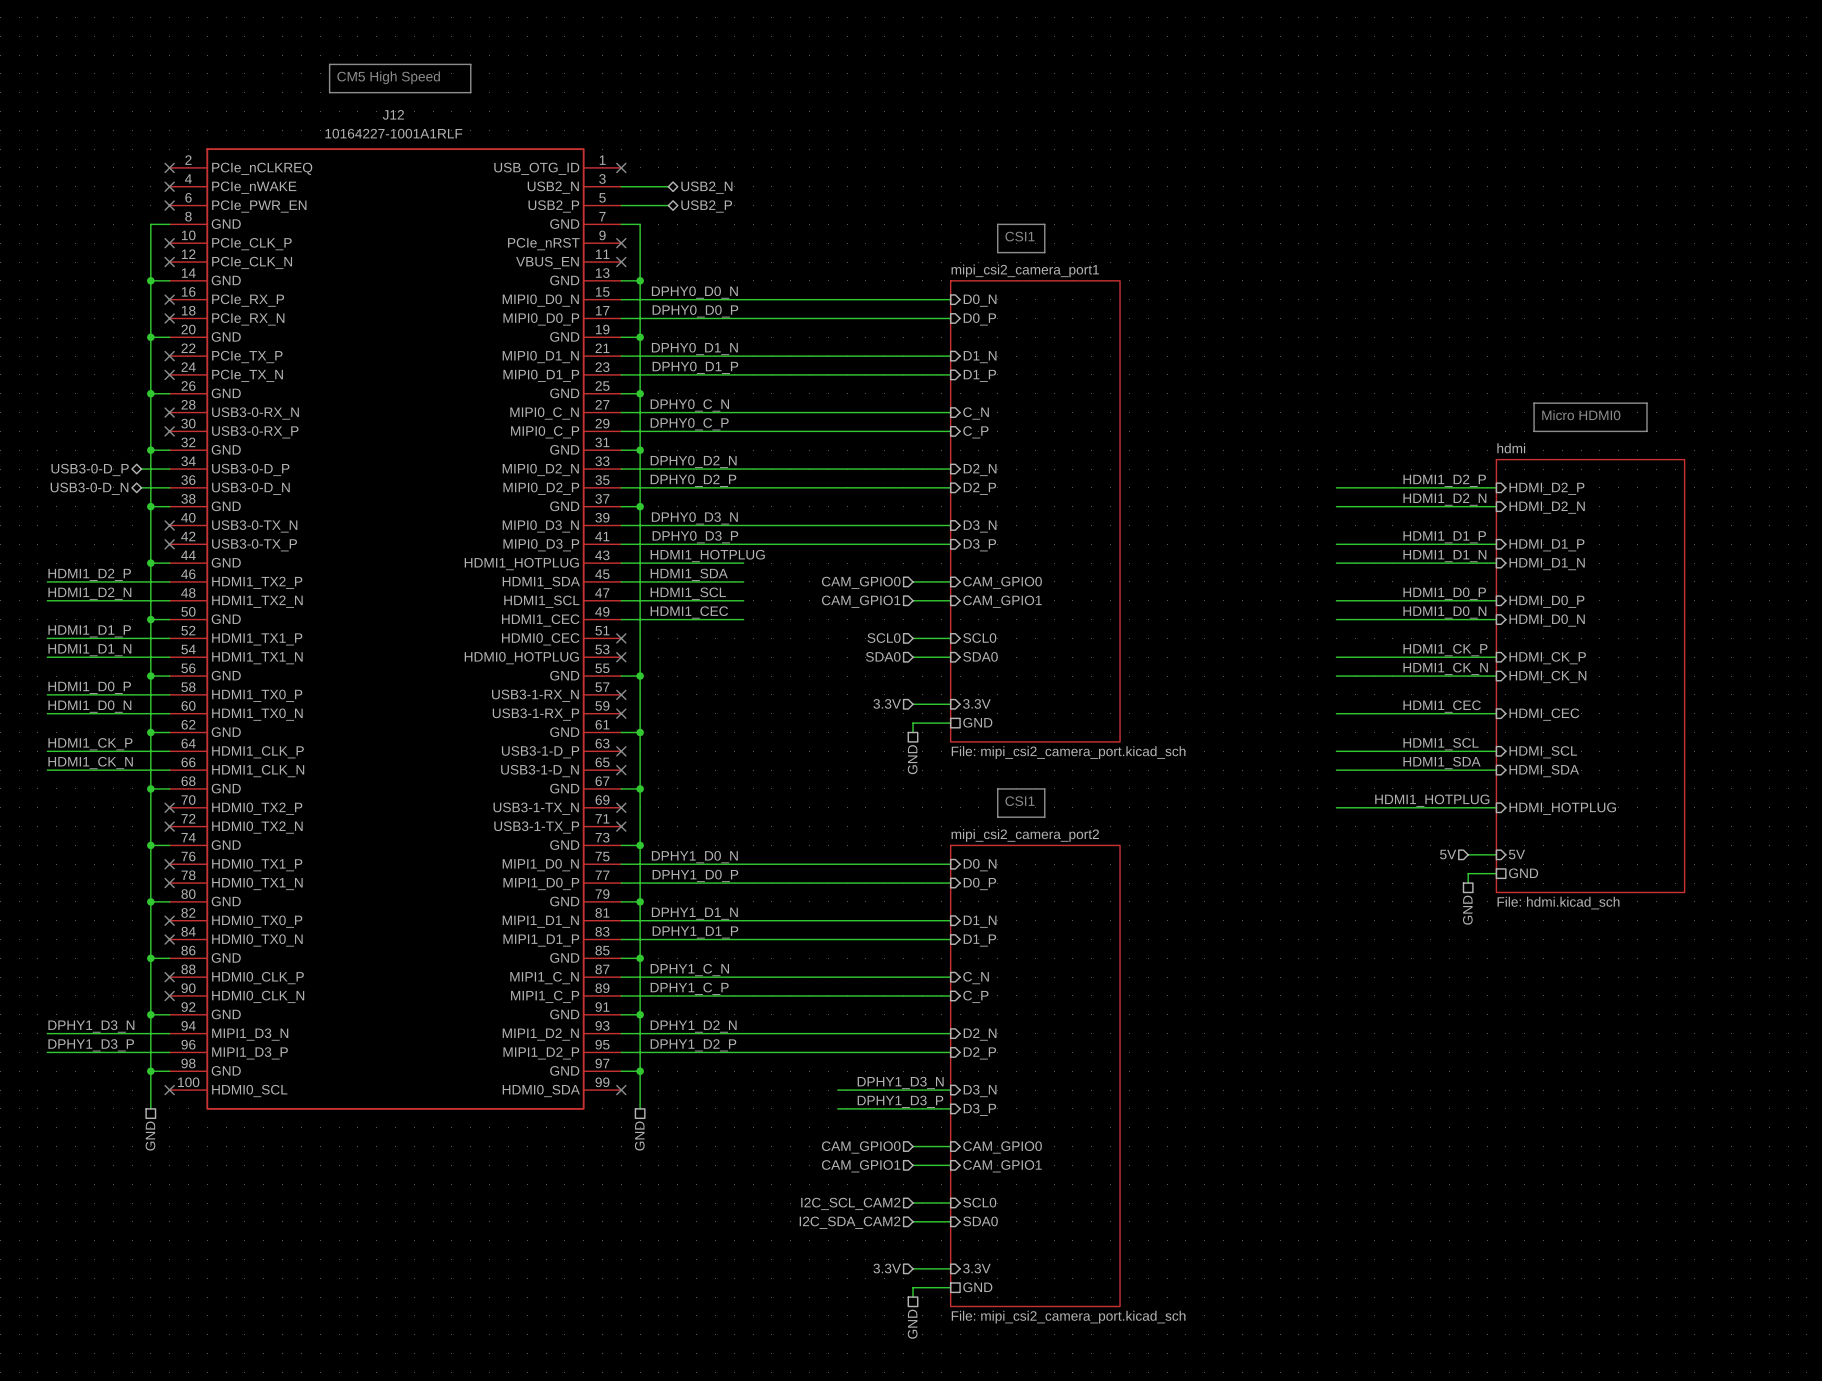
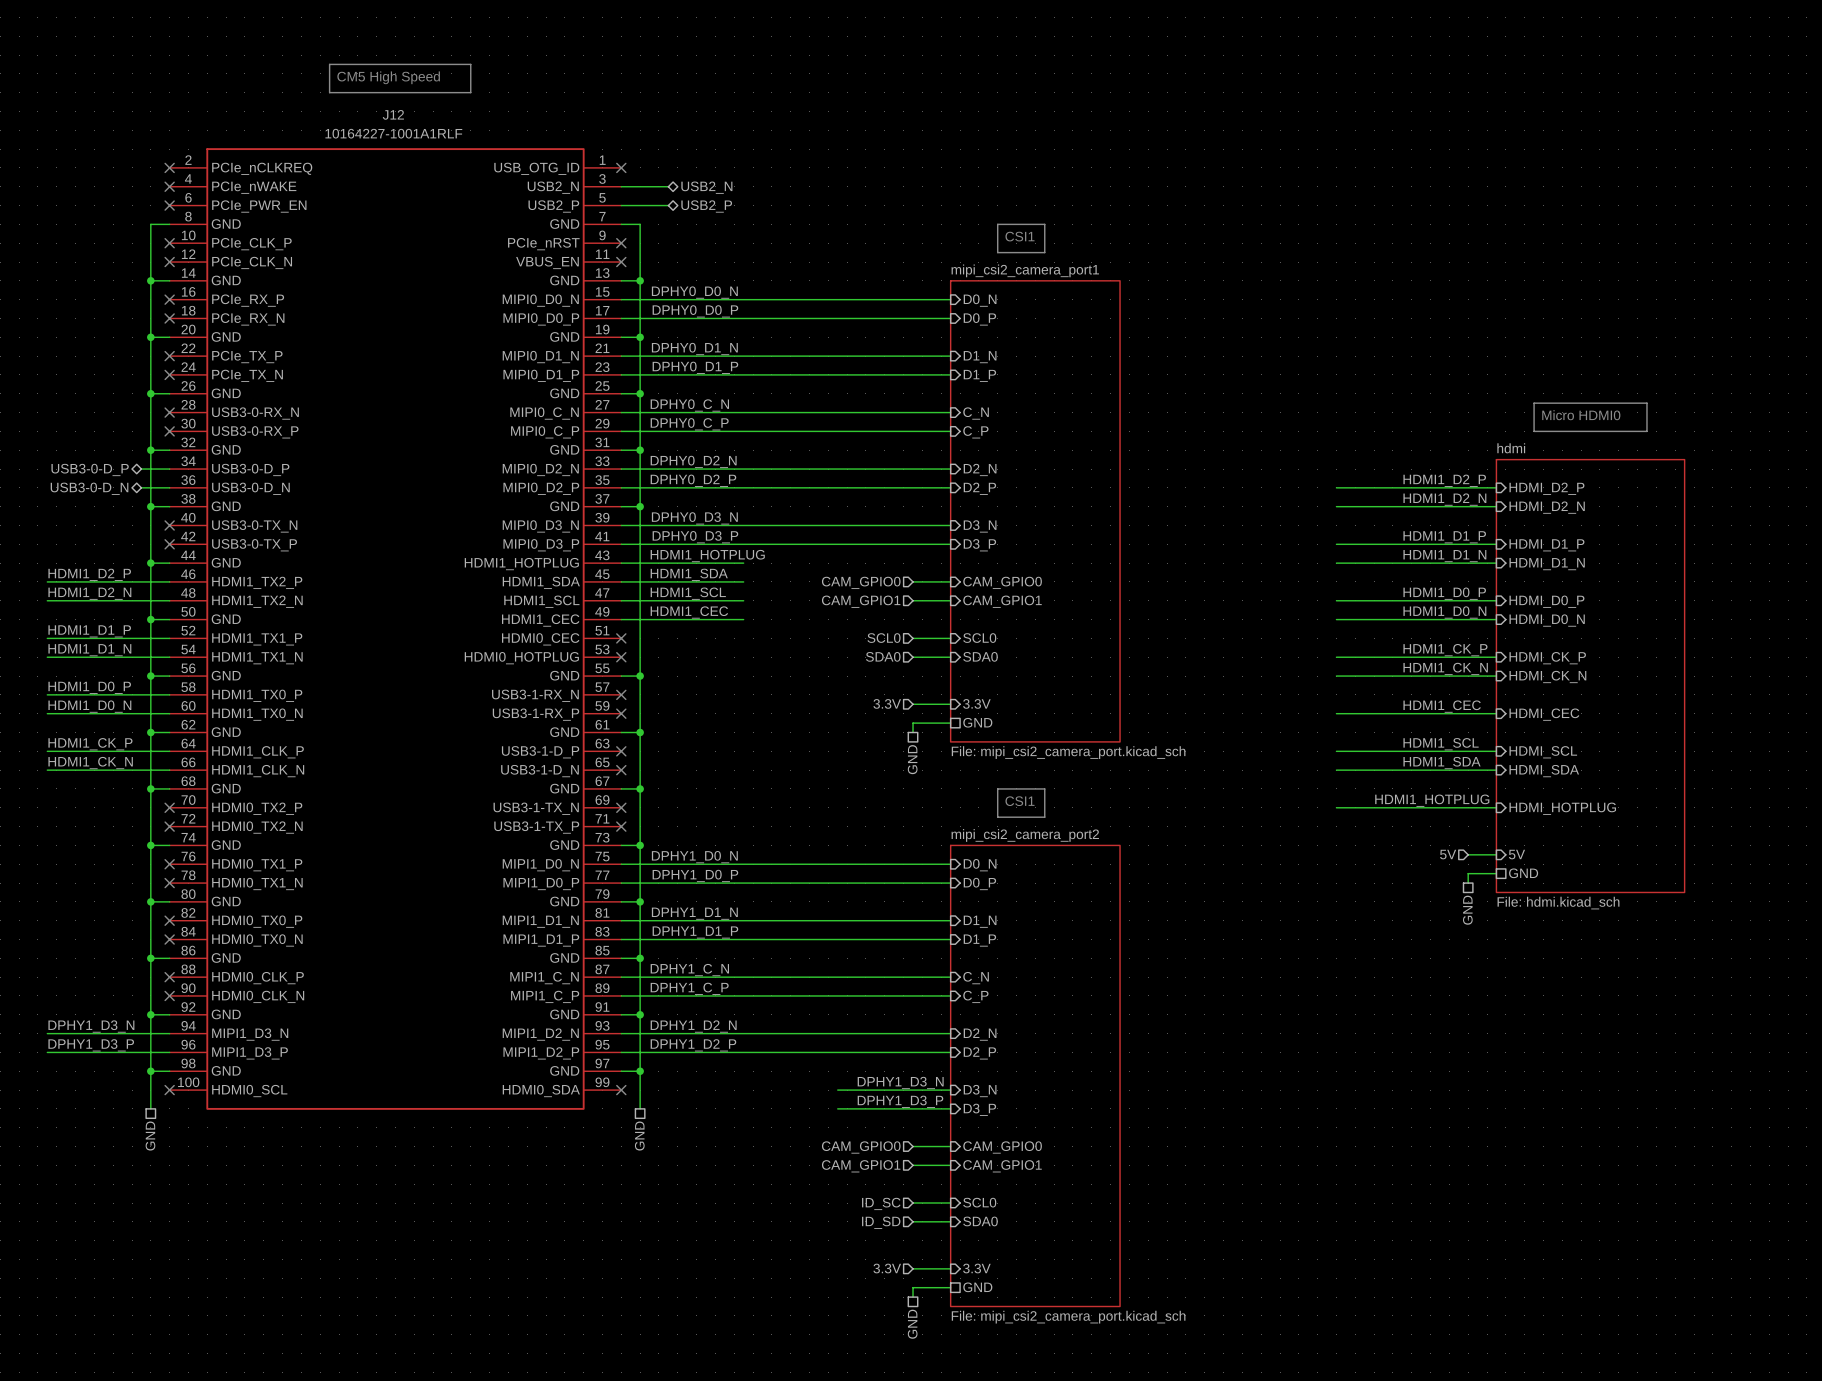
hierarchical label: I2C_SCL_CAM2 (850, 1203) -> ID_SC (881, 1203)
hierarchical label: I2C_SDA_CAM2 (850, 1222) -> ID_SD (881, 1222)

